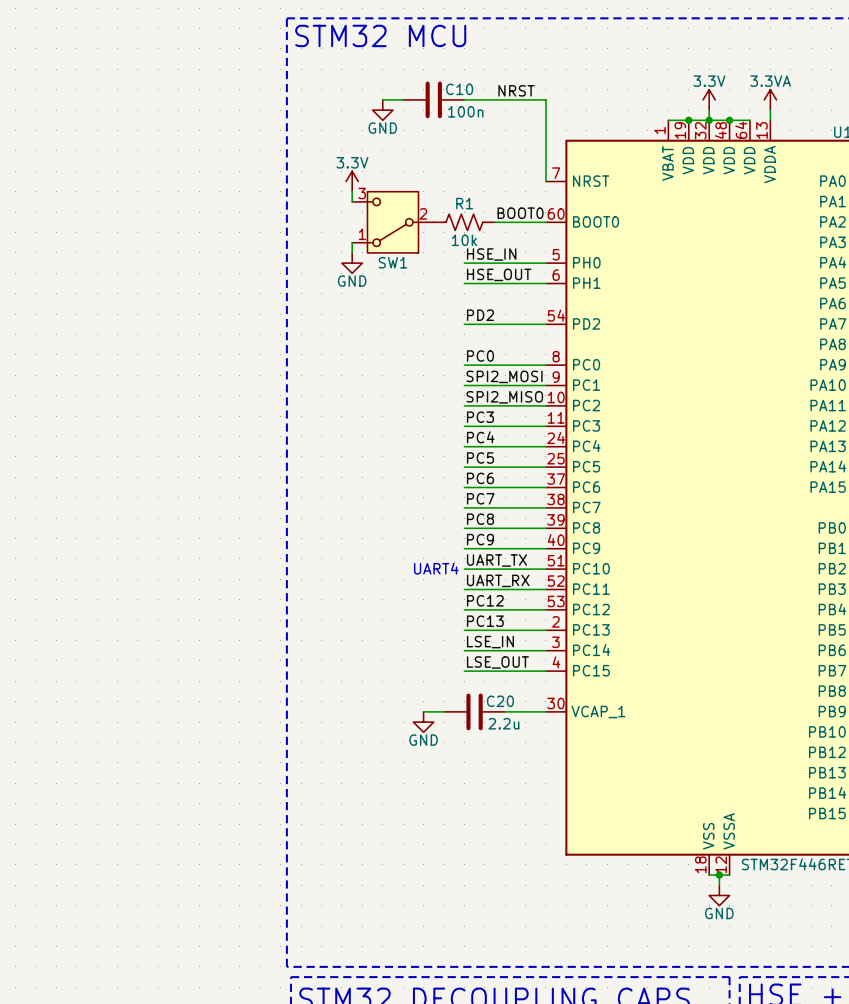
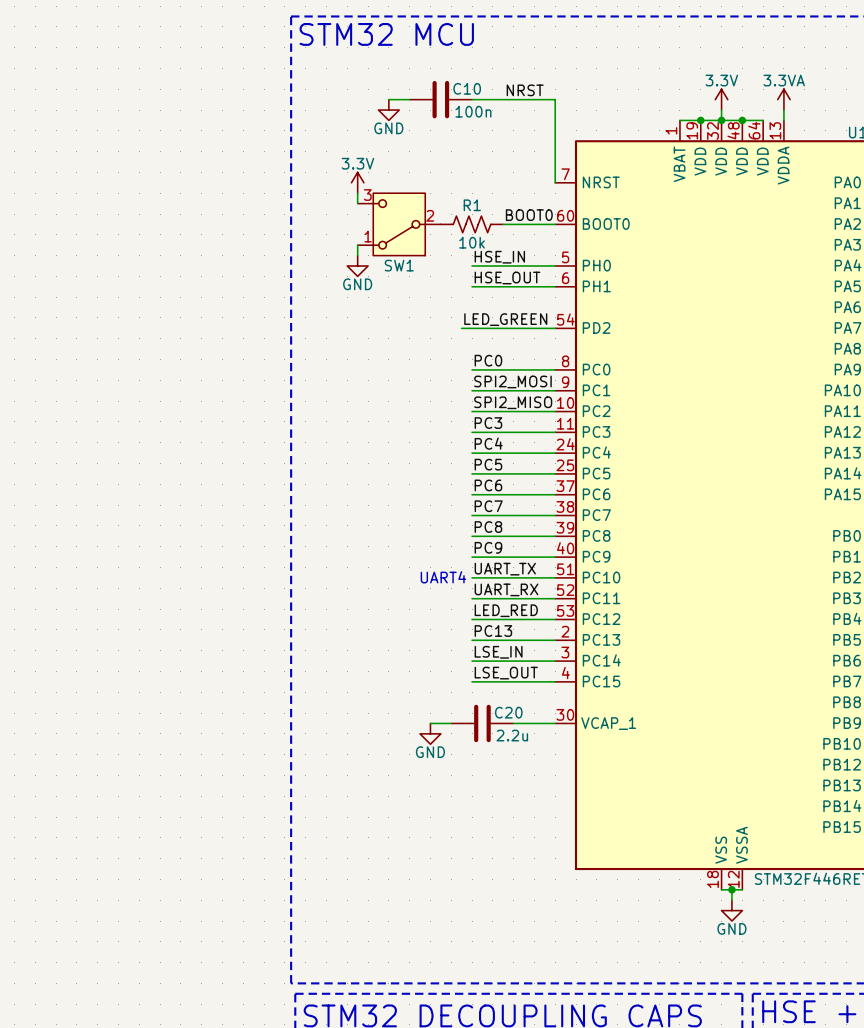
label: PD2 (480, 315) -> none
label: none -> LED_GREEN (505, 319)
wire: none -> (461, 328) (472, 328)
label: PC12 (485, 600) -> LED_RED (506, 610)

